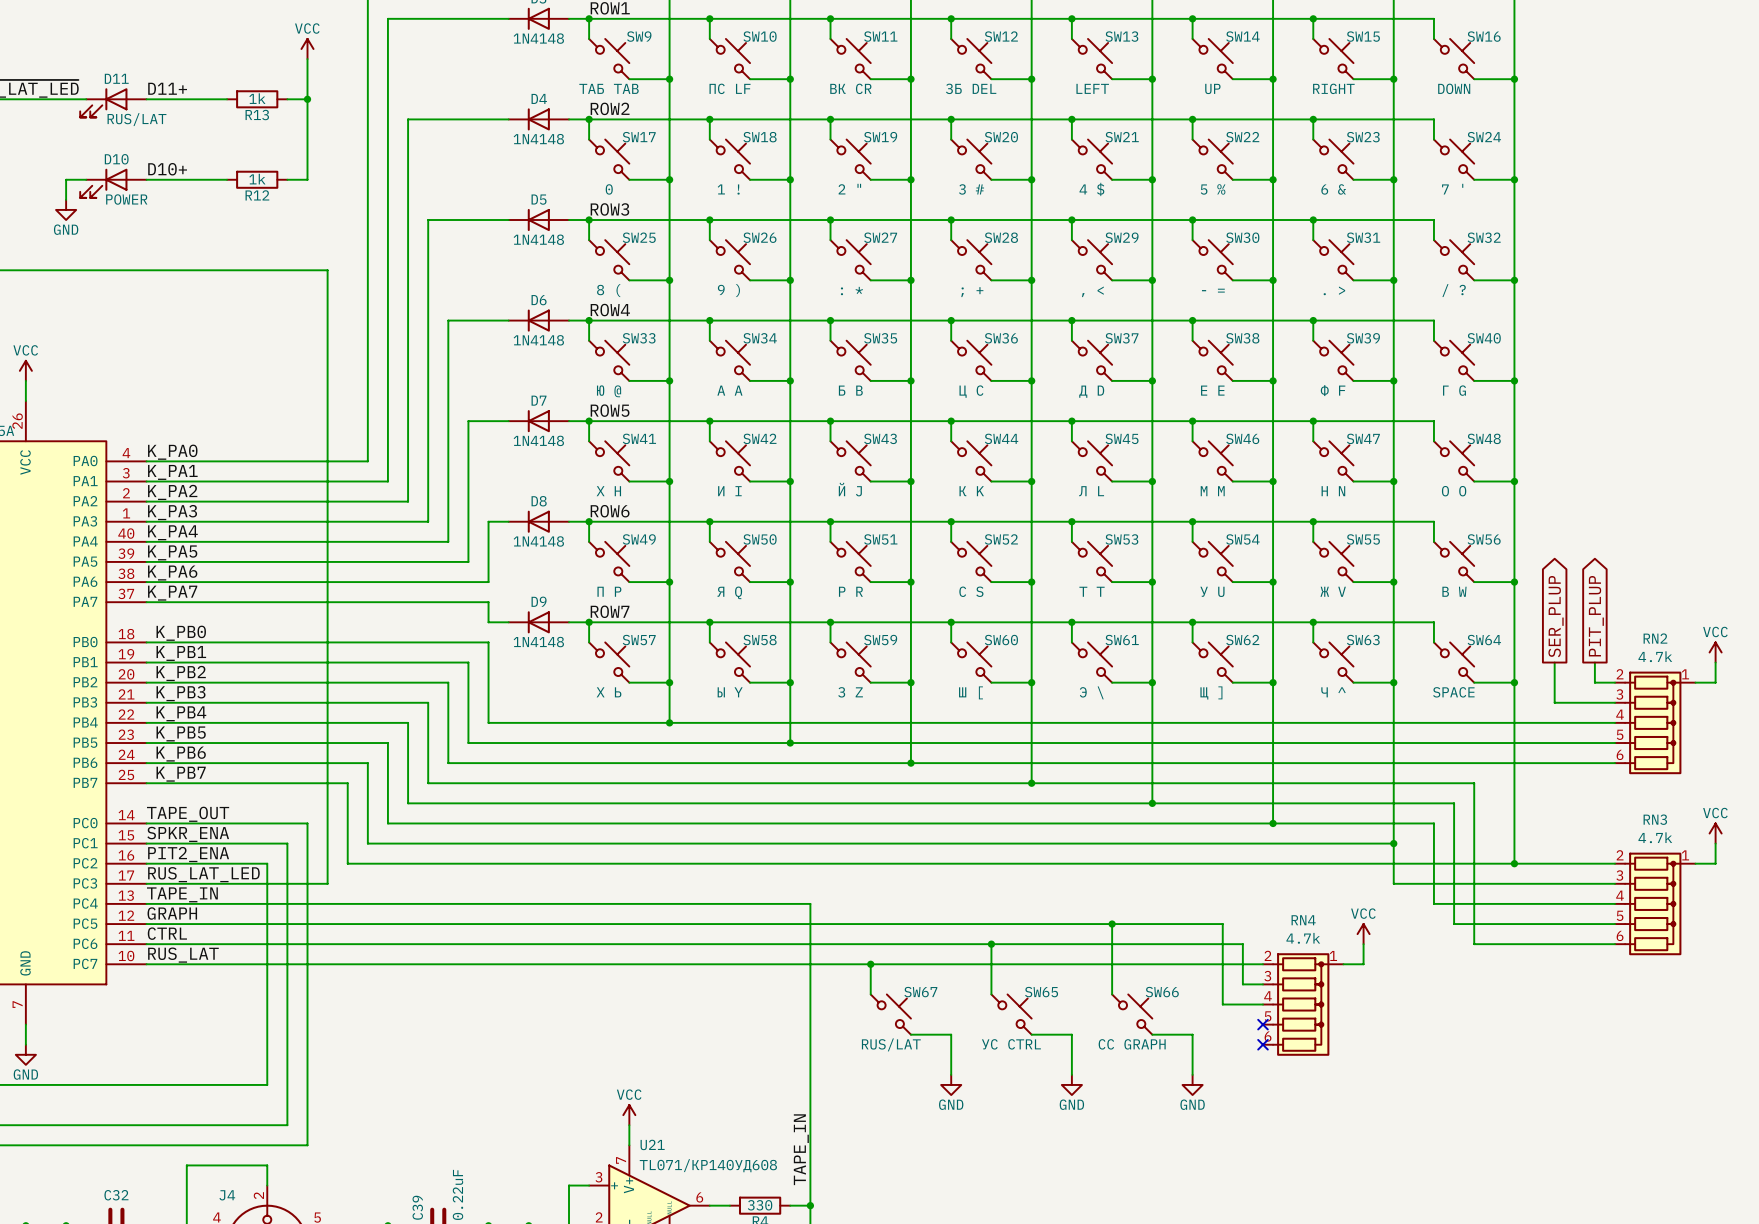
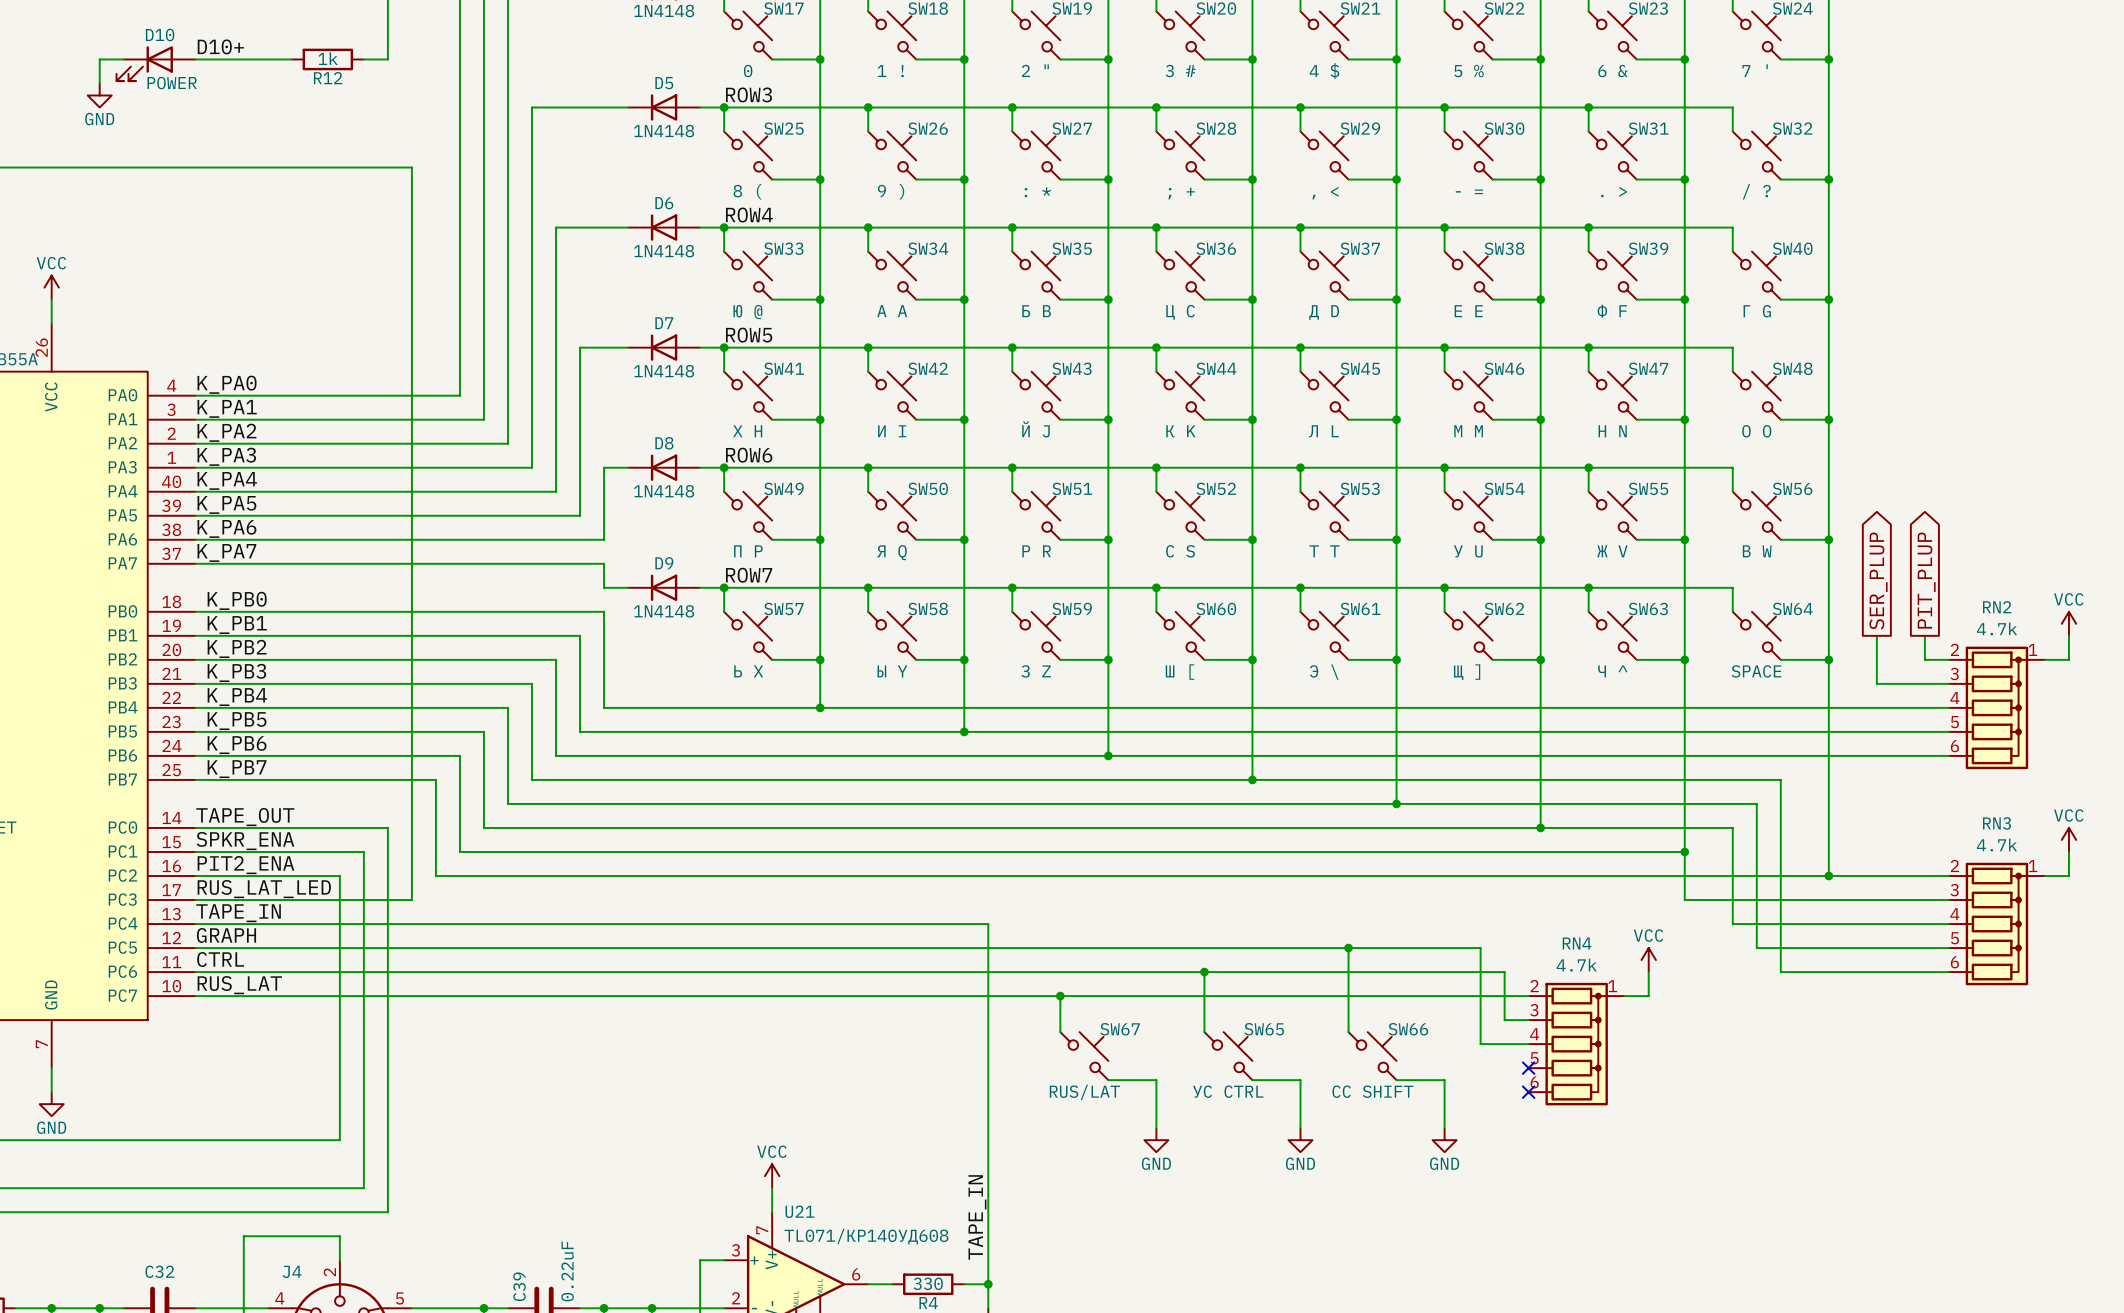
SW57 value: X Ь (609, 692) -> Ь X (748, 671)
SW66 value: CC GRAPH (1132, 1044) -> CC SHIFT (1372, 1091)

